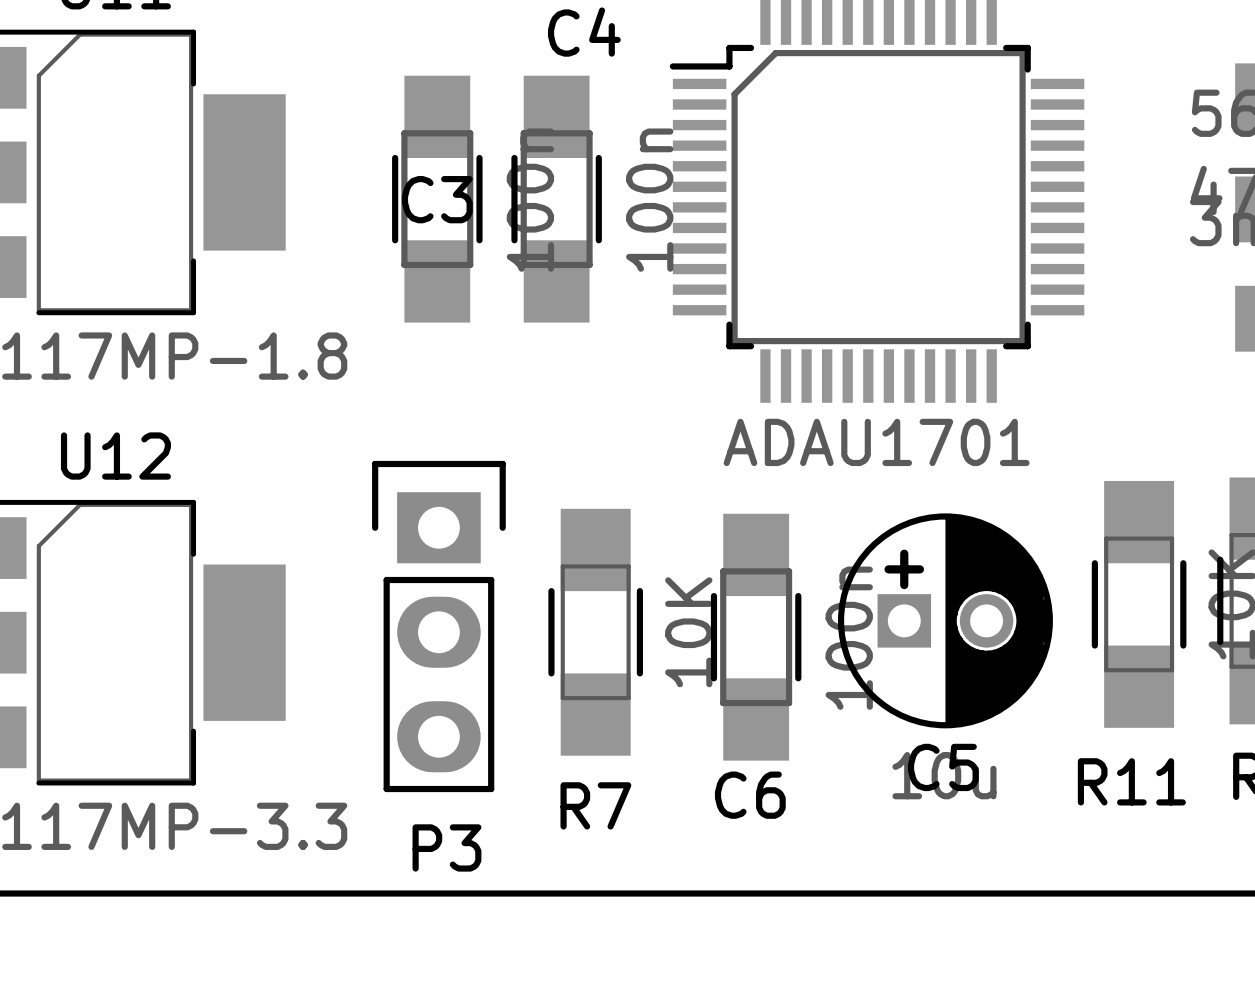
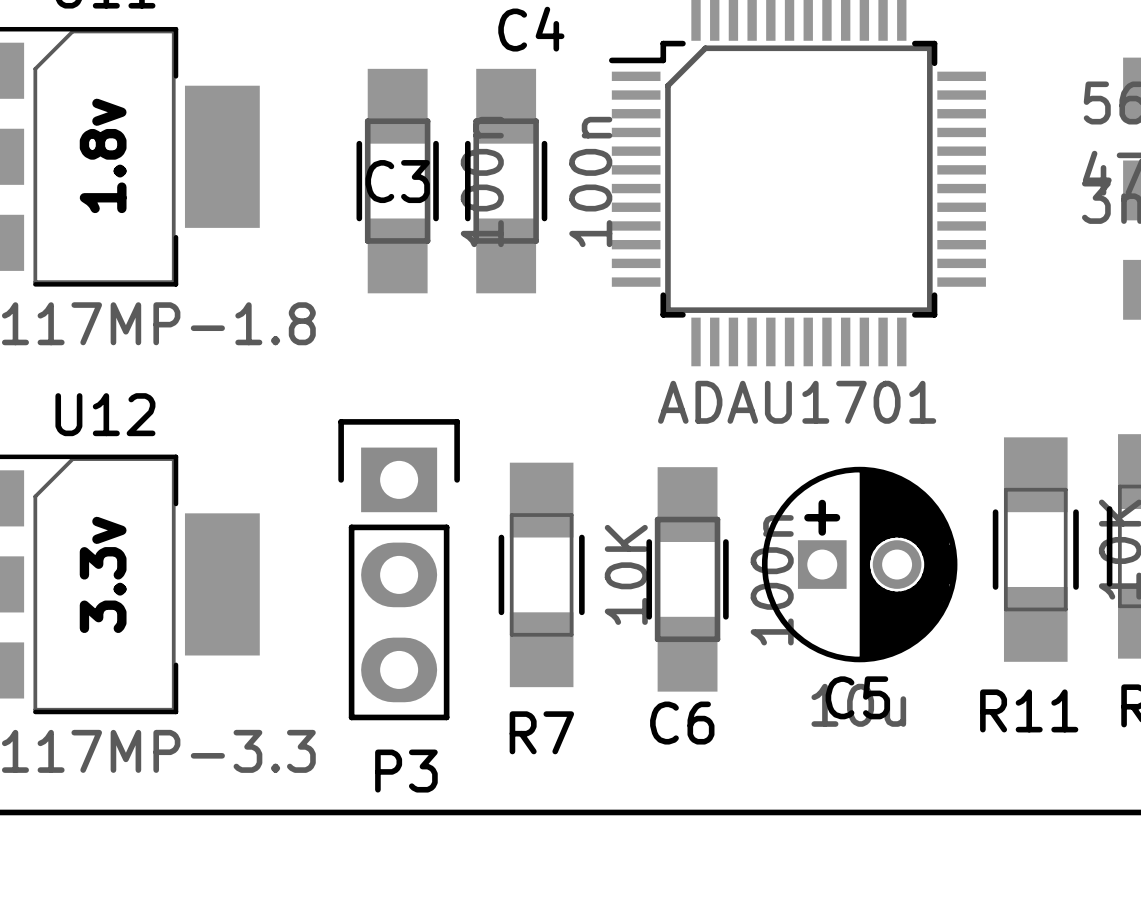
text: none -> 1.8v (103, 155)
text: none -> 3.3v (103, 574)

